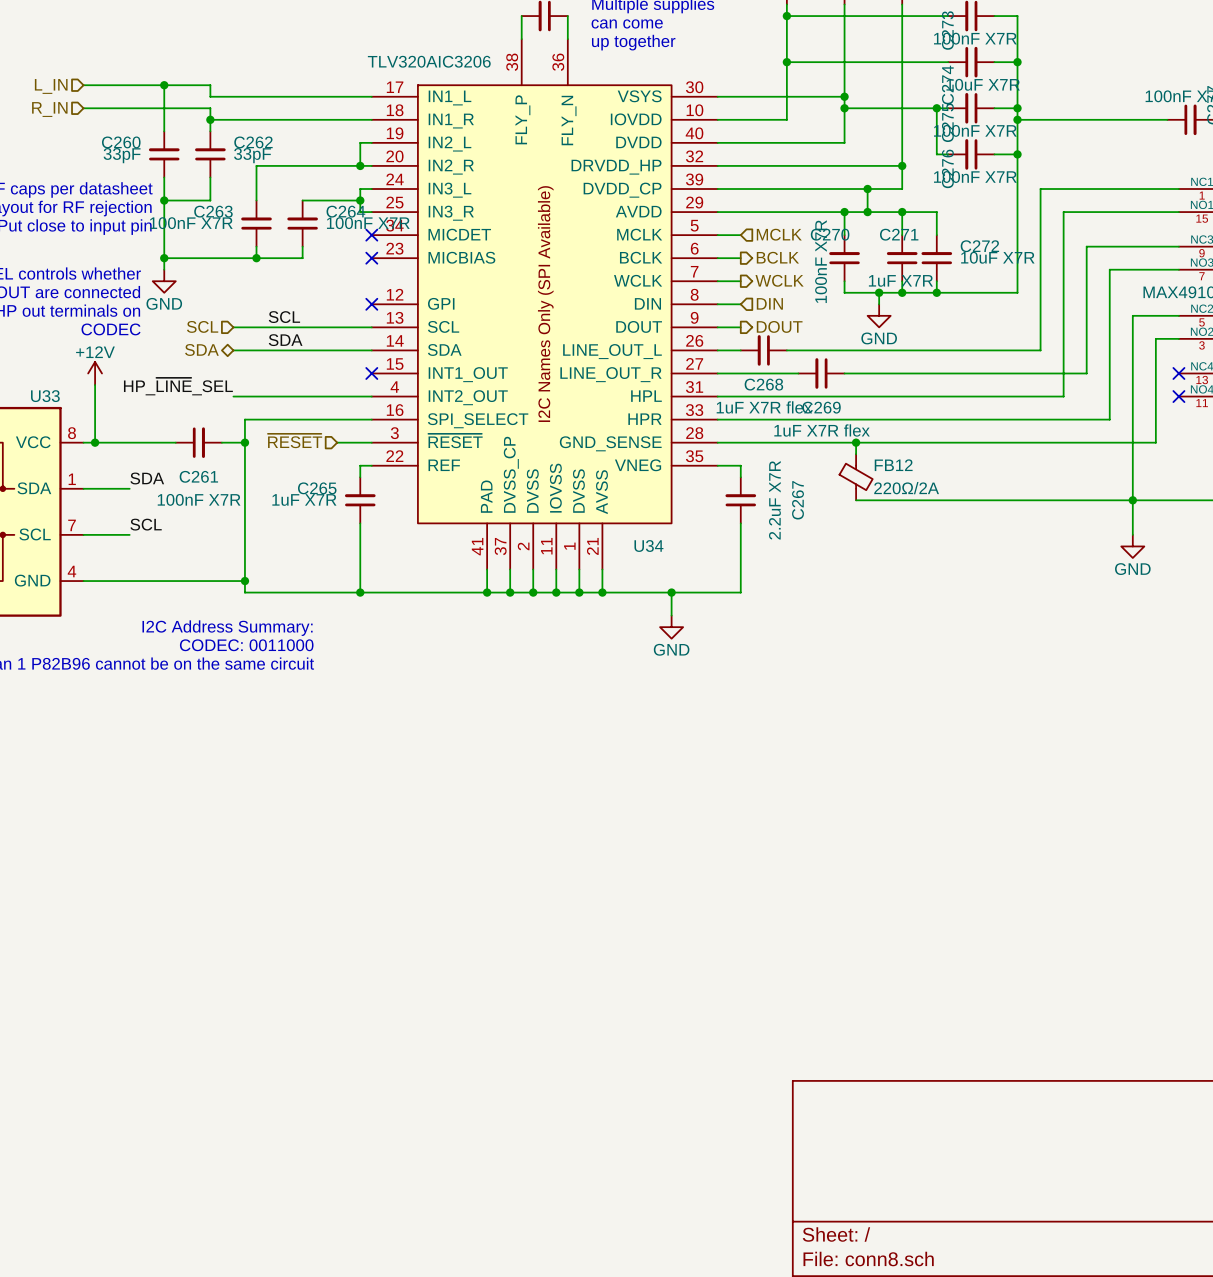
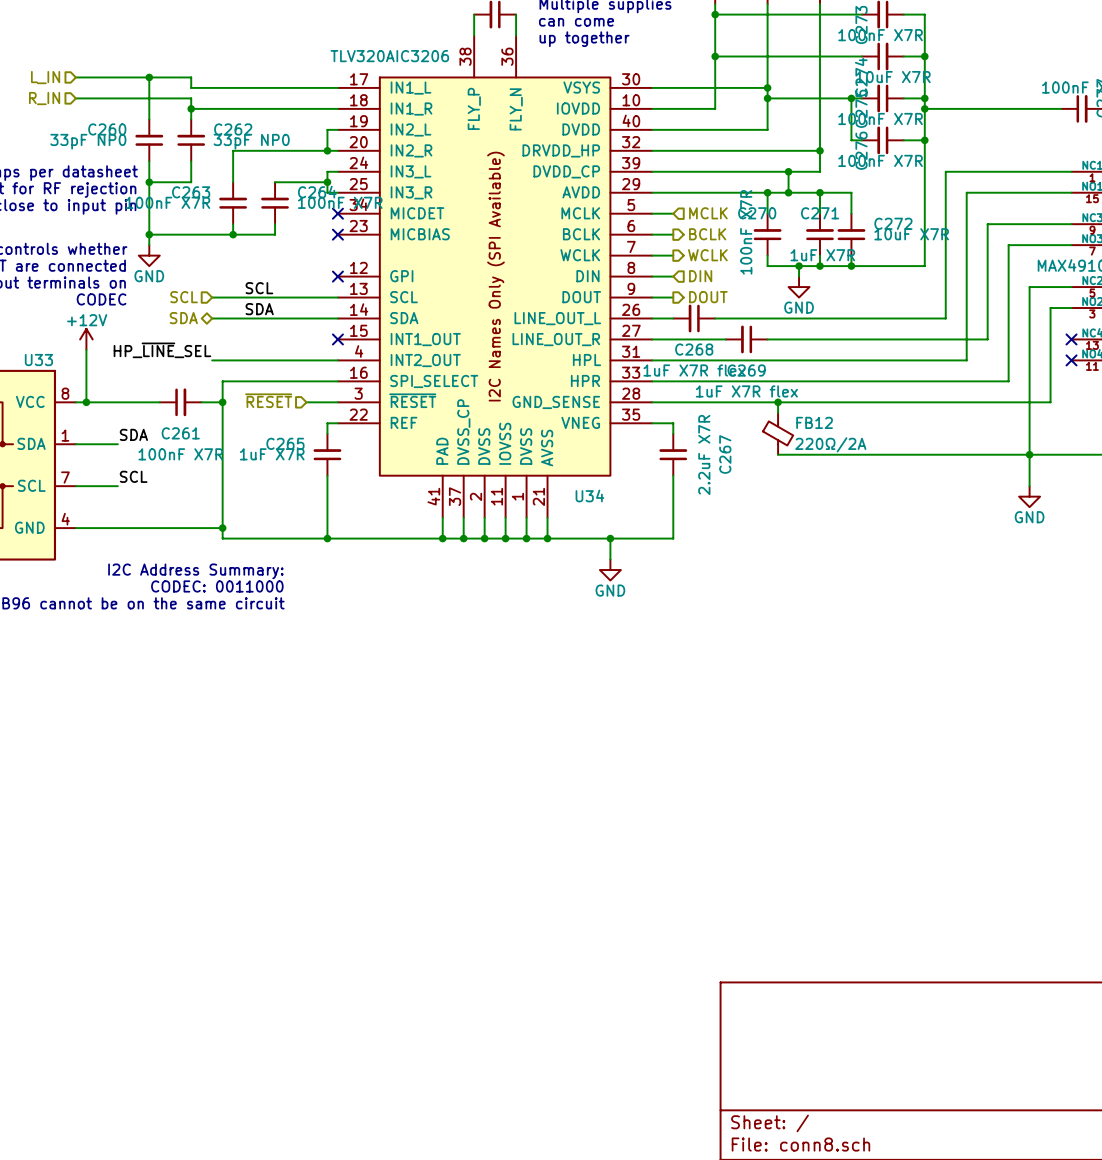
C260 value: 33pF (122, 155) -> 33pF NP0 (88, 141)
C262 value: 33pF (252, 155) -> 33pF NP0 (251, 141)

